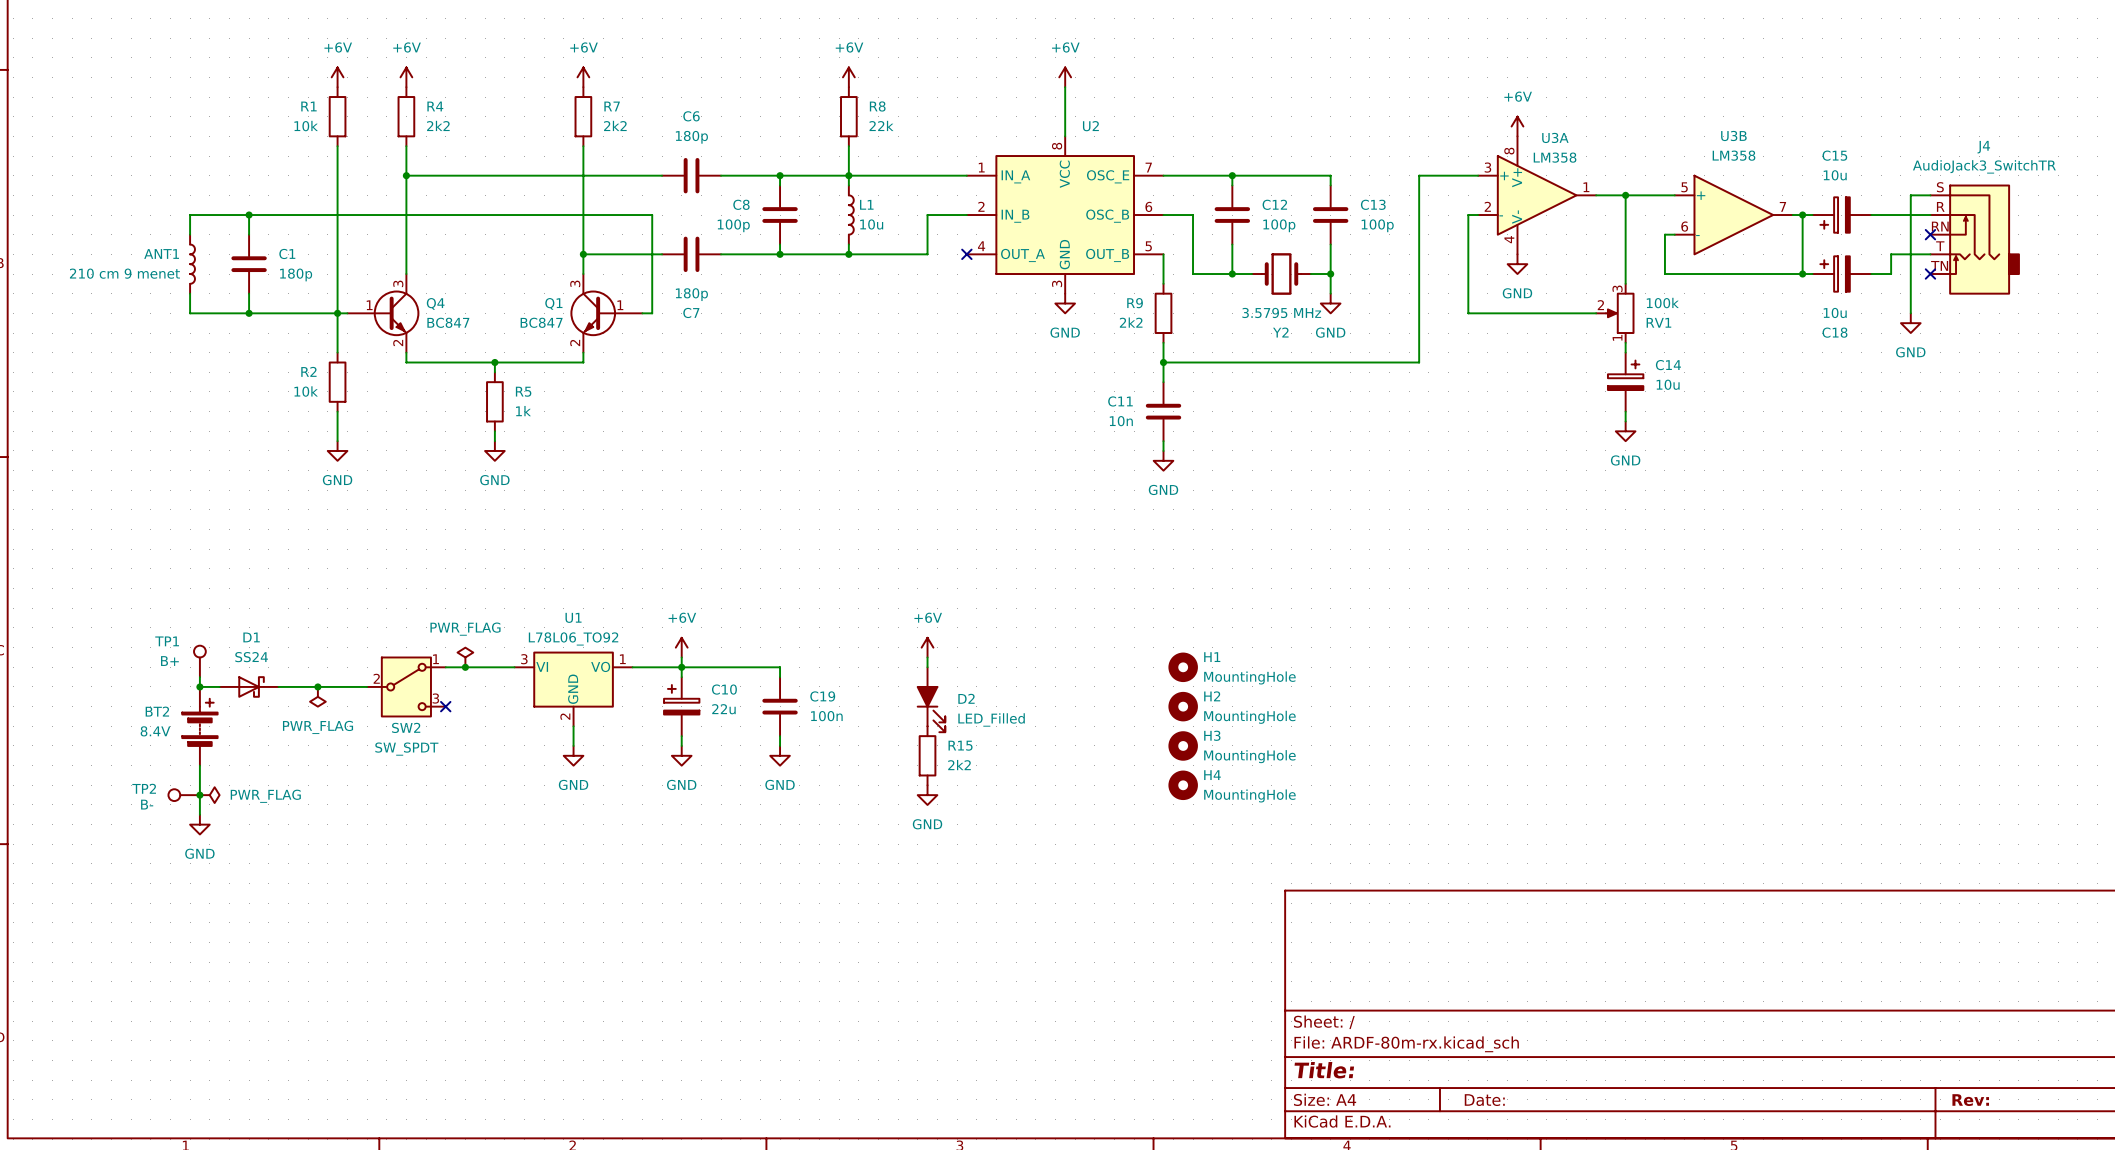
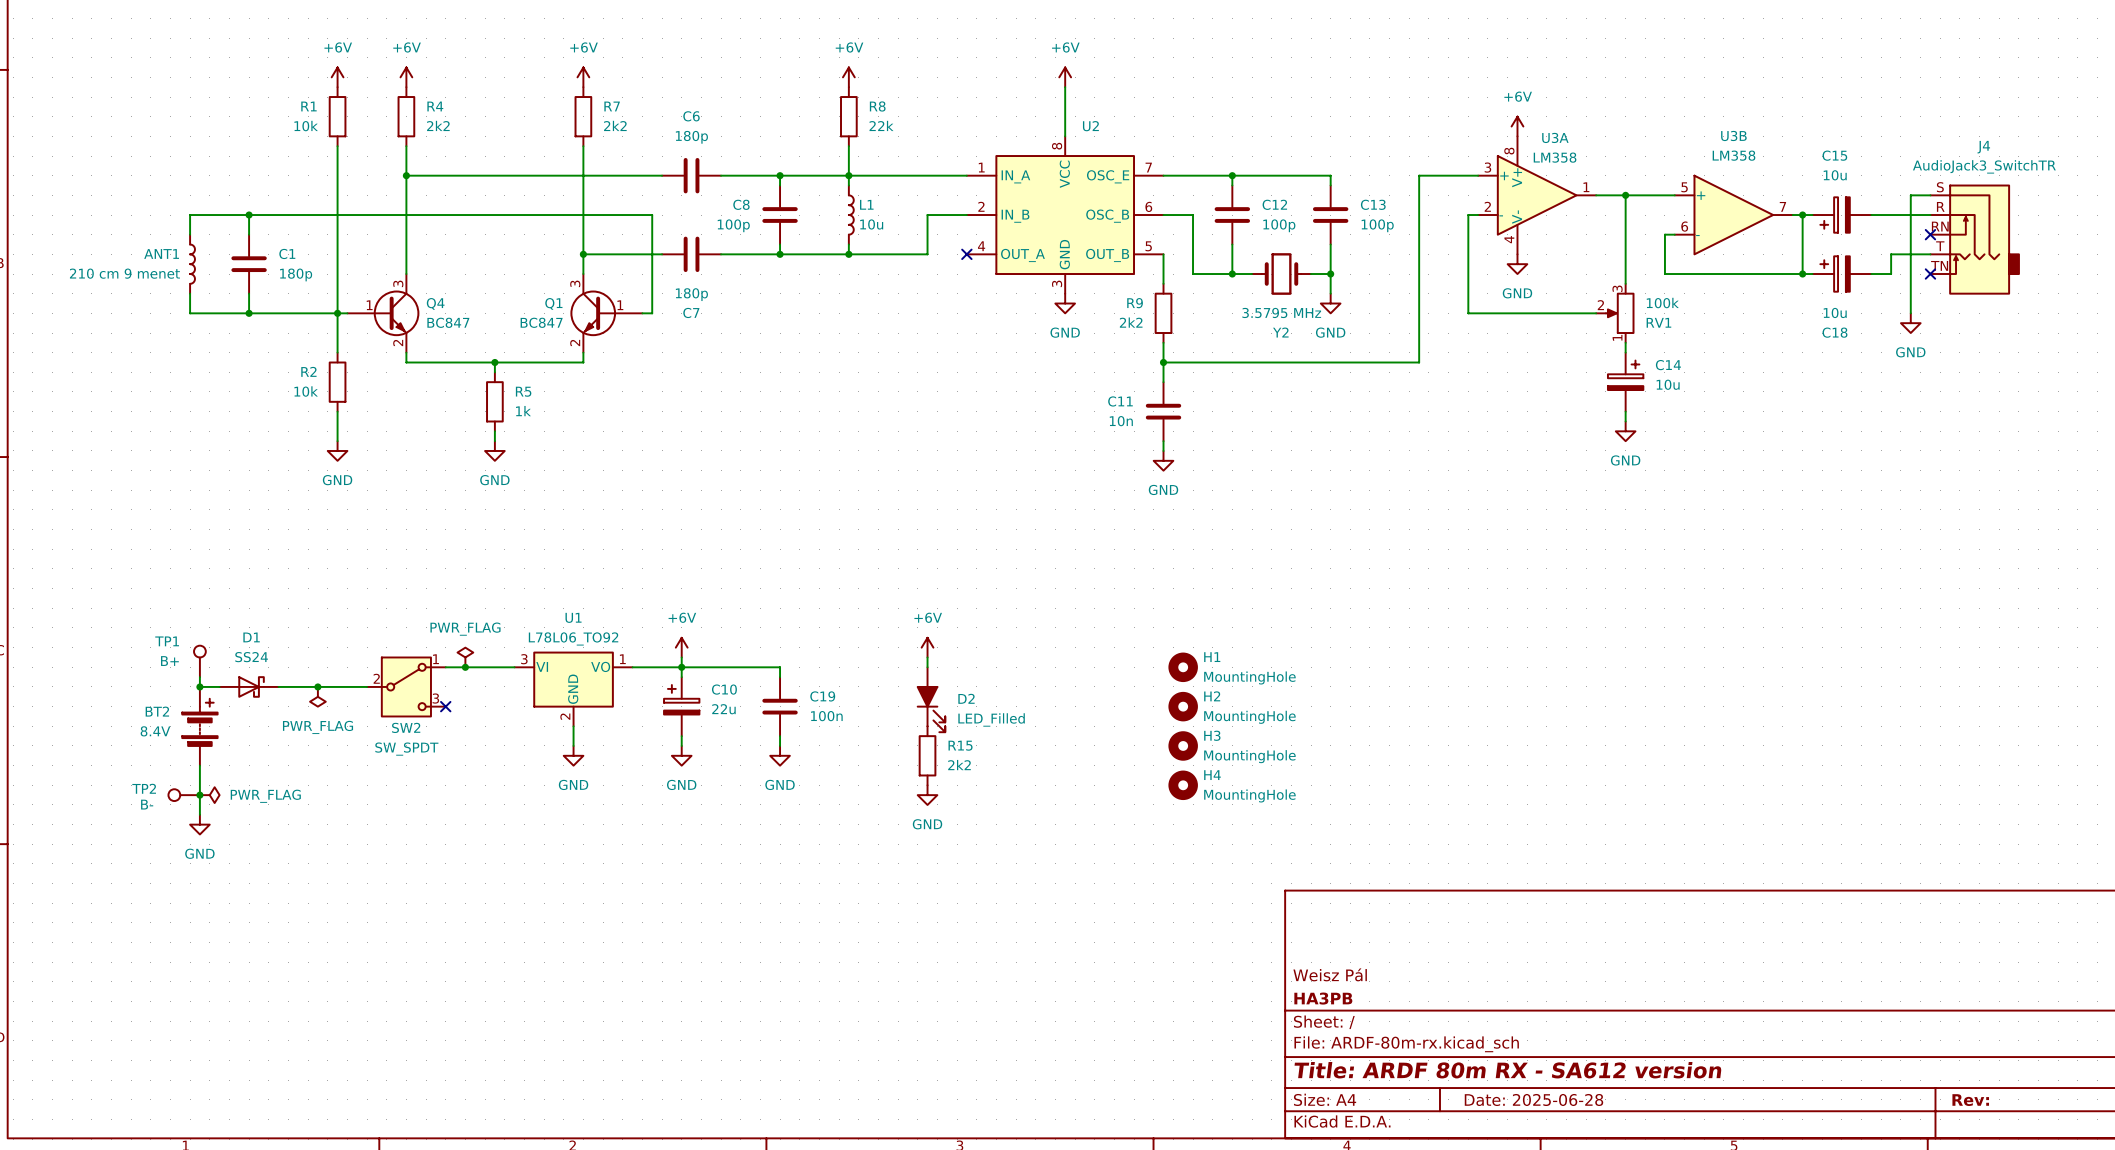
title block: none -> Weisz Pál (1330, 974)
title block: none -> HA3PB (1323, 998)
title block: Title: (1324, 1070) -> Title: ARDF 80m RX - SA612 version (1508, 1070)
title block: Date: (1484, 1100) -> Date: 2025-06-28 (1533, 1099)

